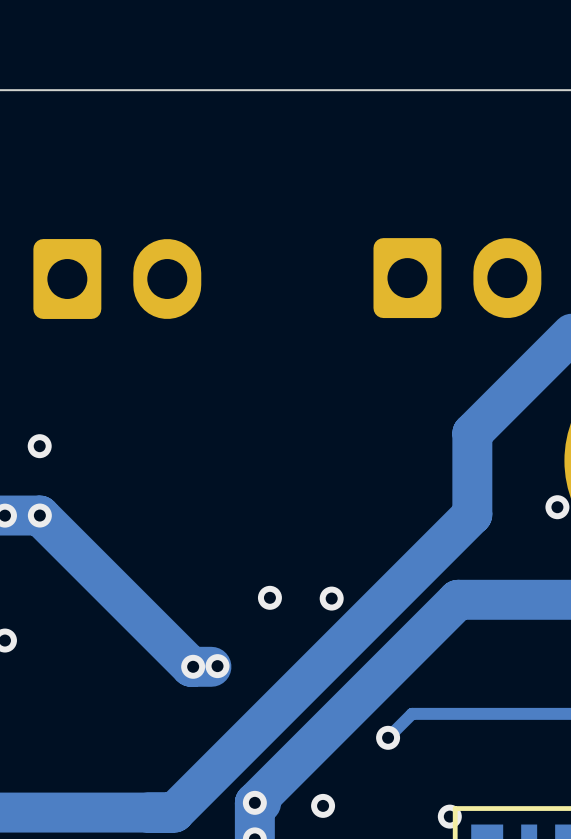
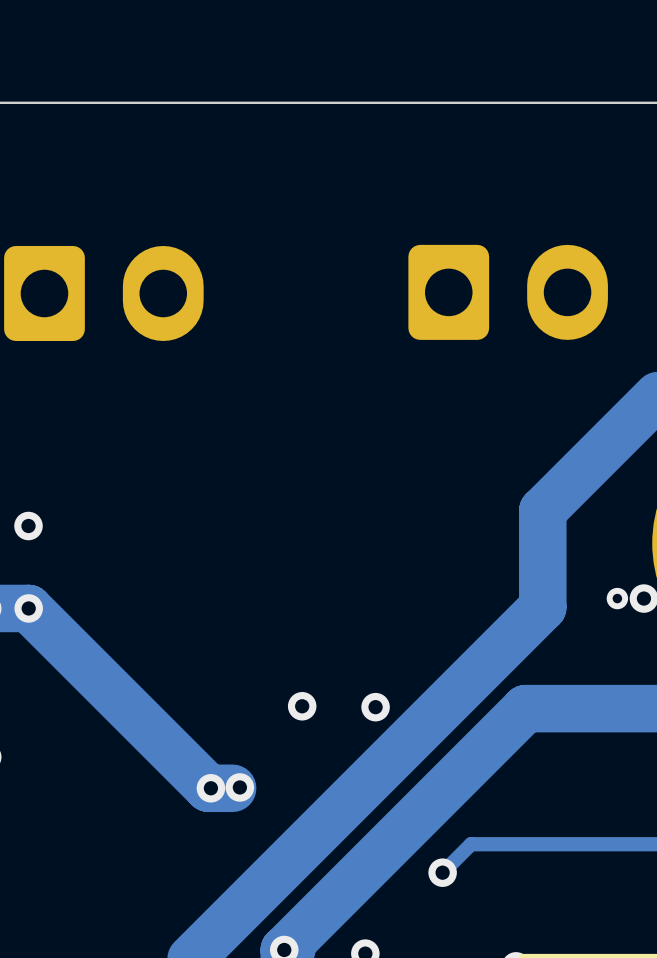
part position: (457, 278) -> (508, 292)
part position: (117, 279) -> (103, 293)
via: none -> (617, 598)

